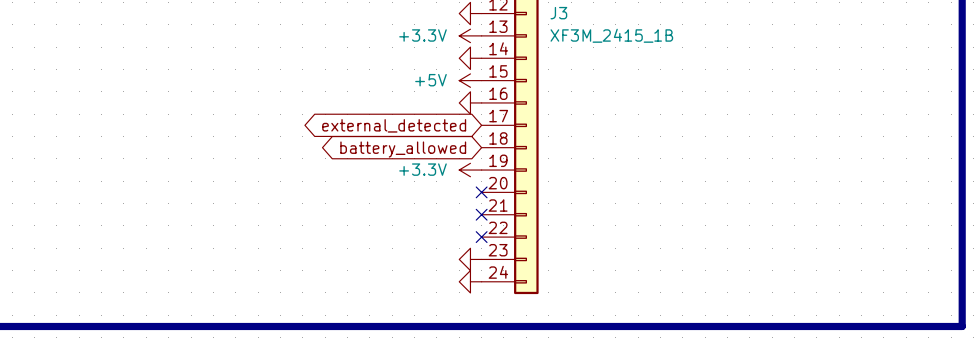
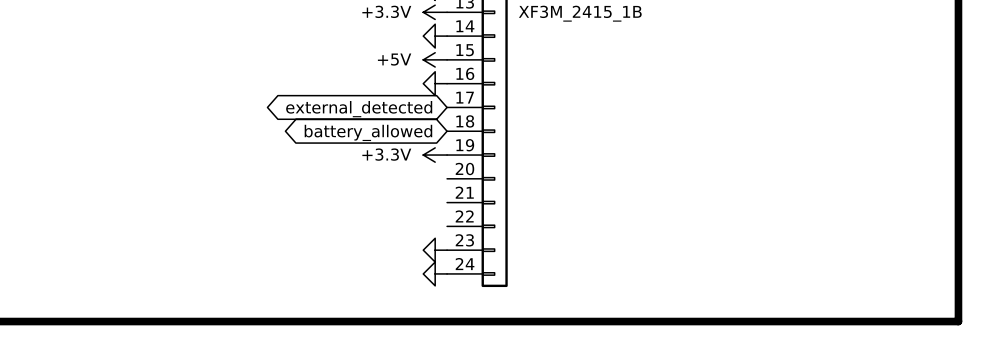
no-connect mark: (481, 192) -> none
no-connect mark: (481, 214) -> none
no-connect mark: (481, 237) -> none

